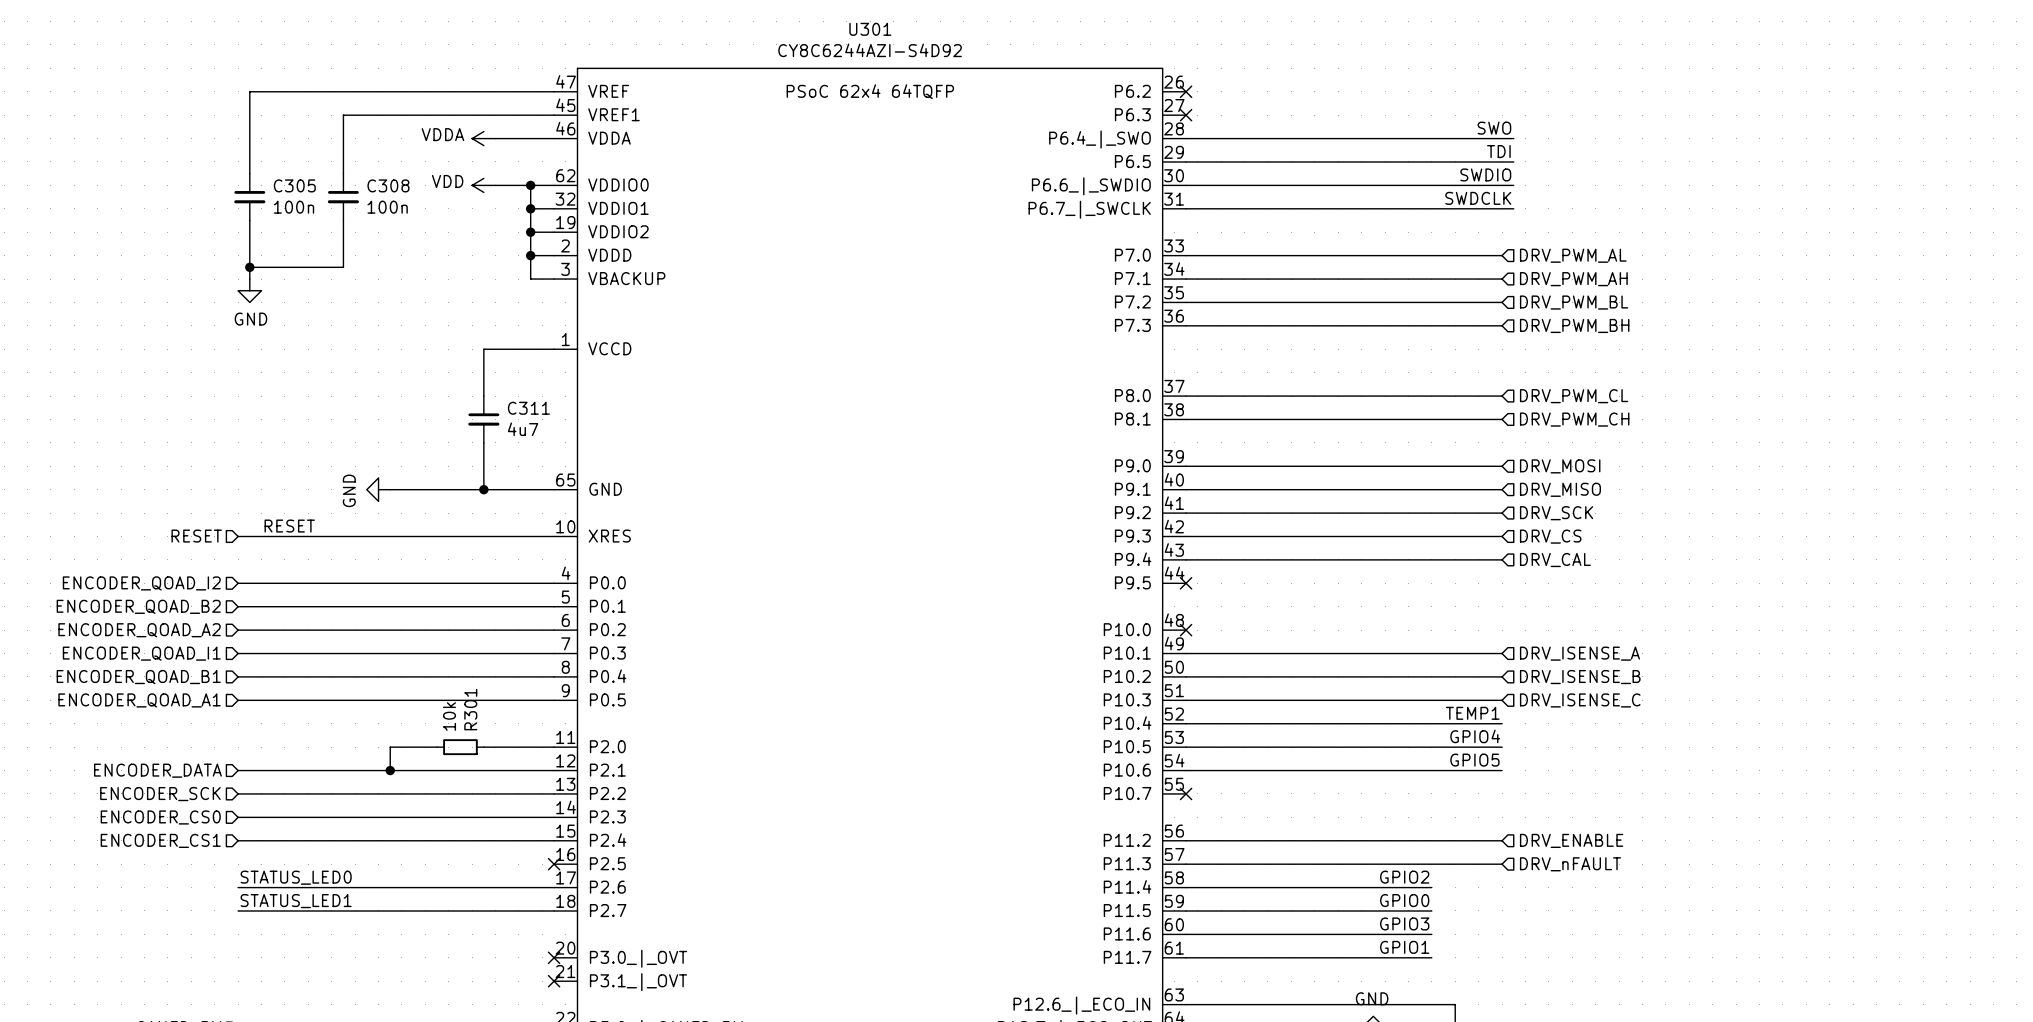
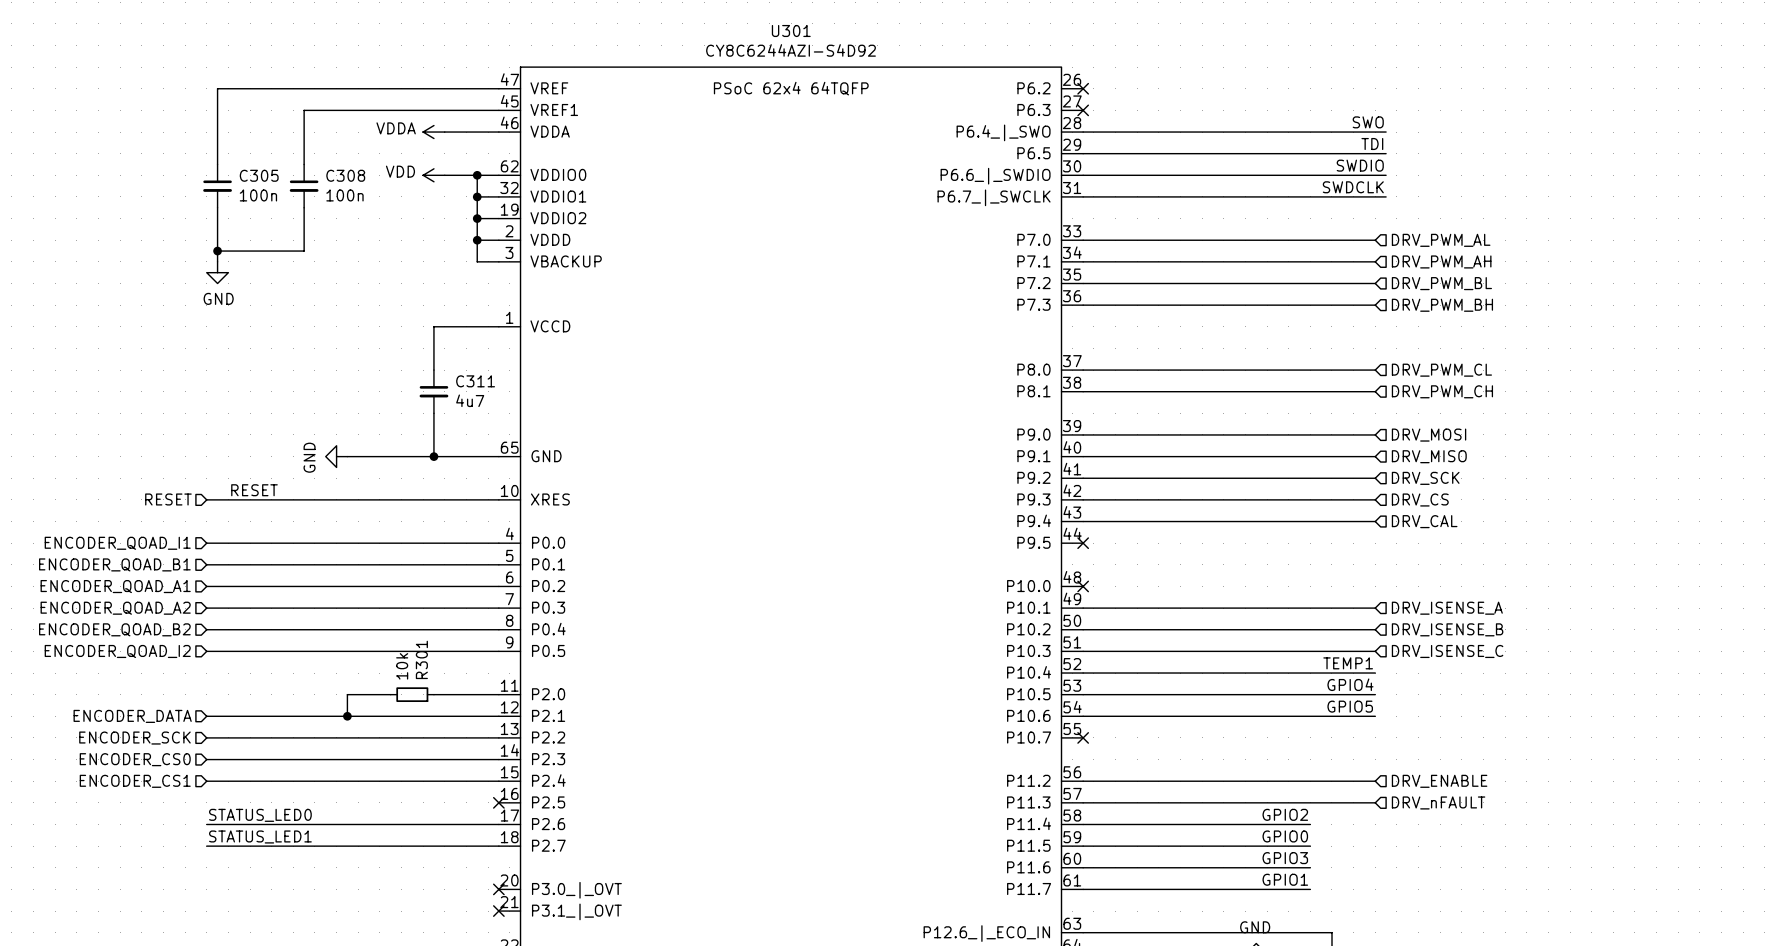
hierarchical label: ENCODER_QOAD_I2 (141, 583) -> ENCODER_QOAD_I1 (117, 543)
hierarchical label: ENCODER_QOAD_B2 (138, 606) -> ENCODER_QOAD_B1 (114, 564)
hierarchical label: ENCODER_QOAD_A2 (139, 630) -> ENCODER_QOAD_A1 (115, 586)
hierarchical label: ENCODER_QOAD_I1 (141, 653) -> ENCODER_QOAD_A2 (115, 608)
hierarchical label: ENCODER_QOAD_B1 (138, 677) -> ENCODER_QOAD_B2 (114, 629)
hierarchical label: ENCODER_QOAD_A1 (139, 700) -> ENCODER_QOAD_I2 (117, 651)

